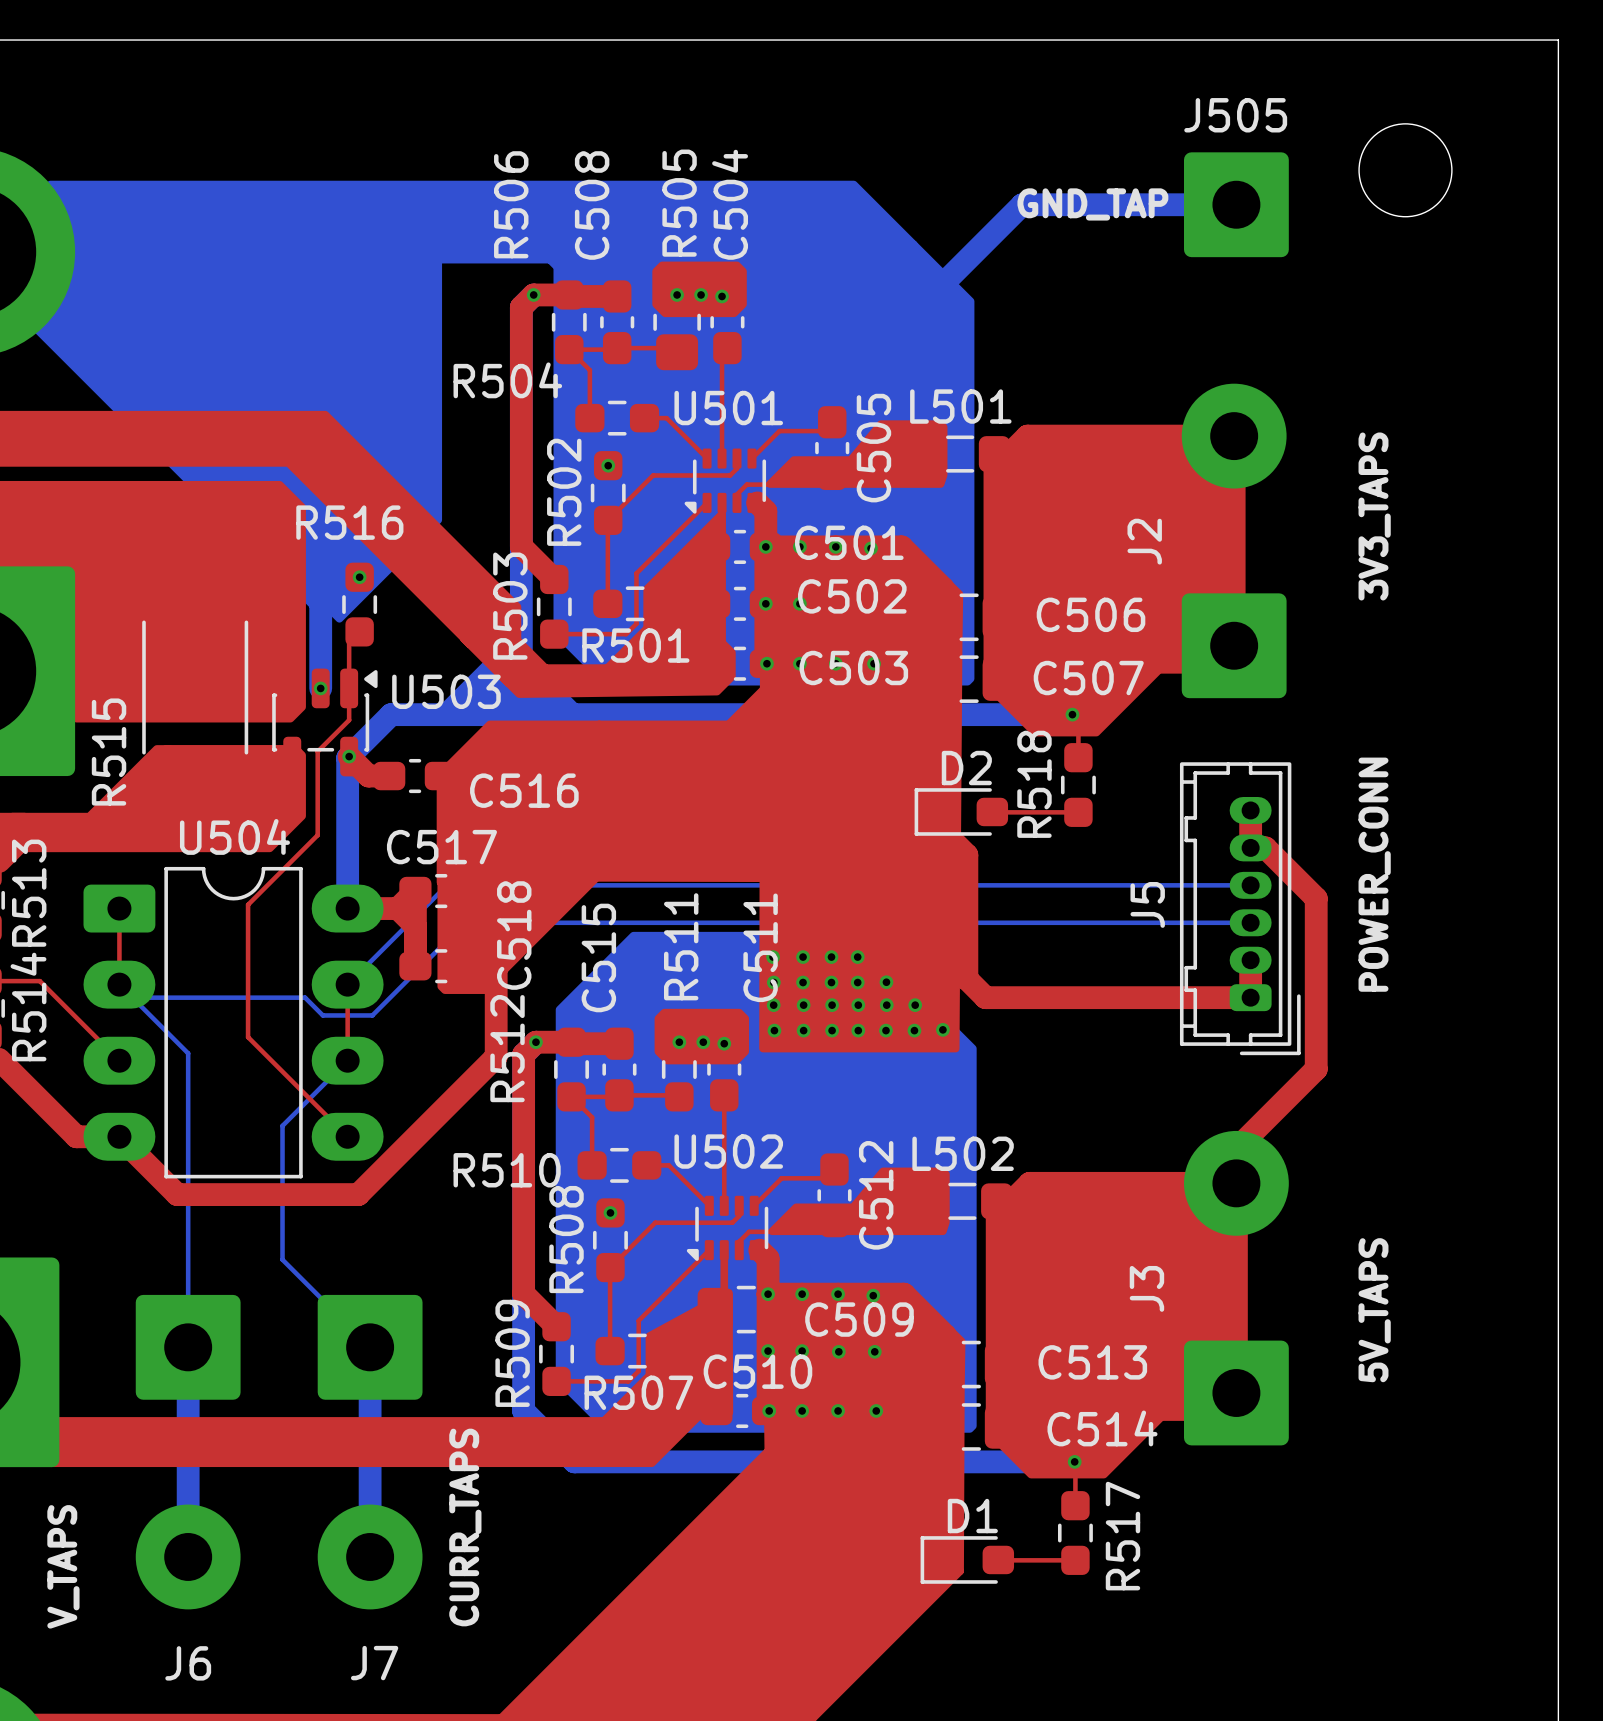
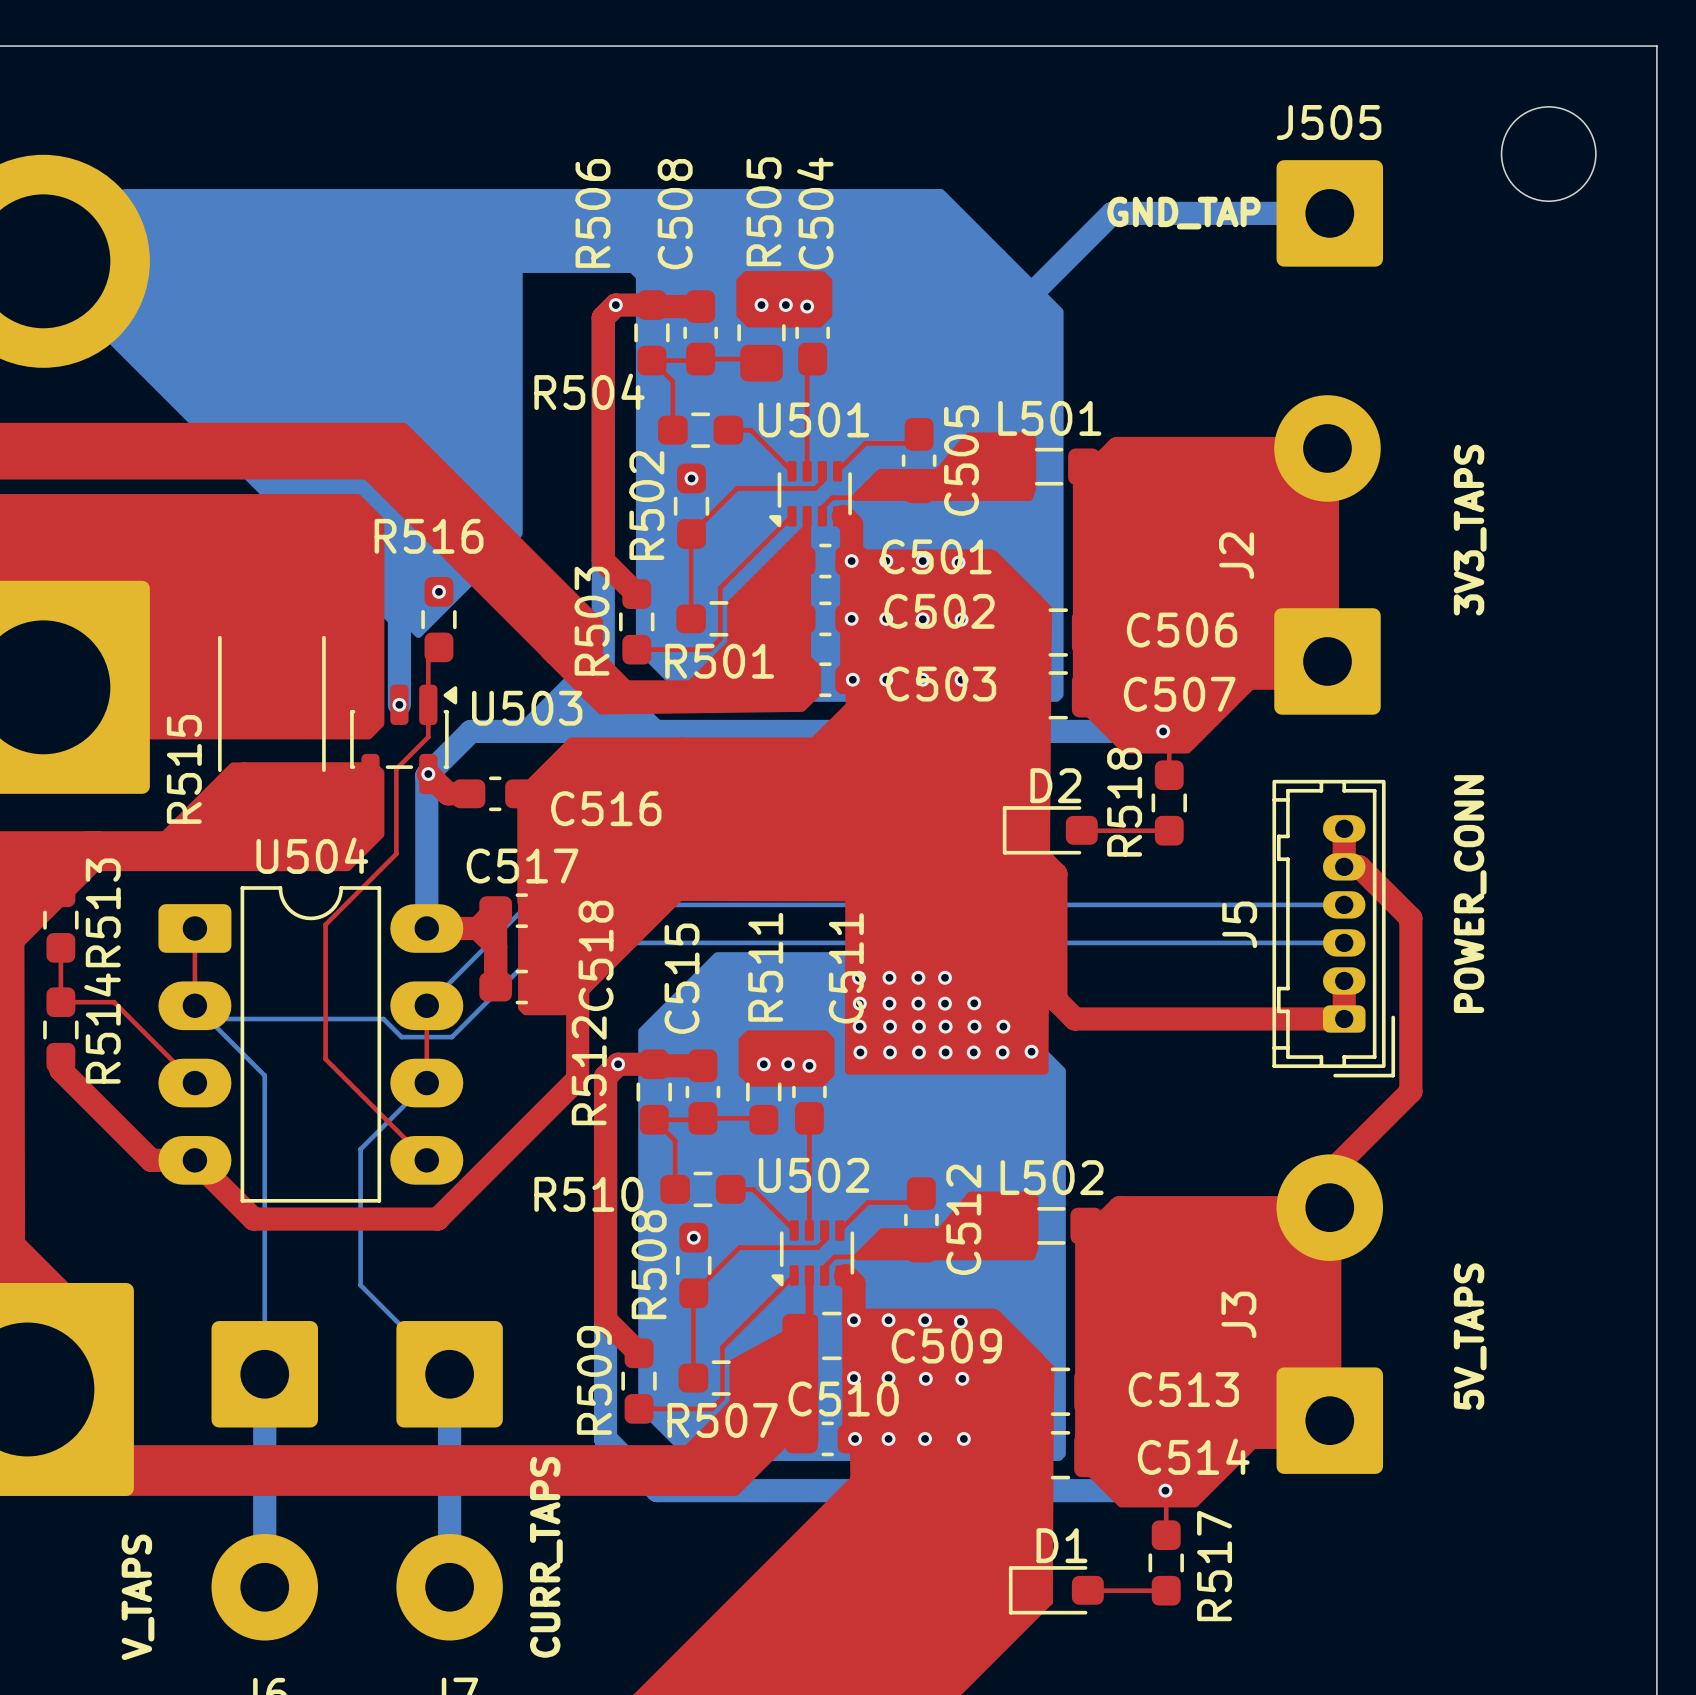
round board edge position: (1405, 170) -> (1548, 154)
via: none -> (922, 619)
via: none -> (961, 619)

